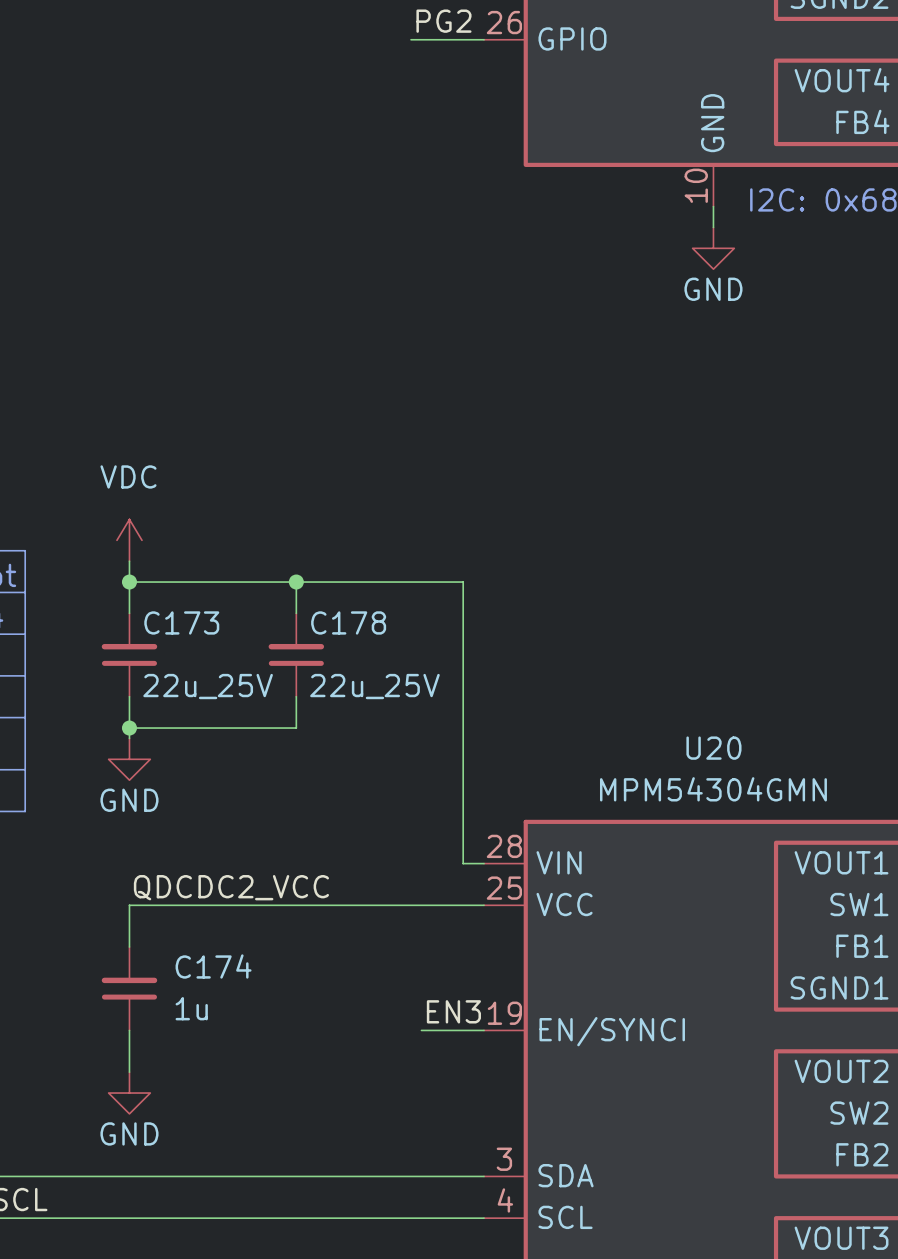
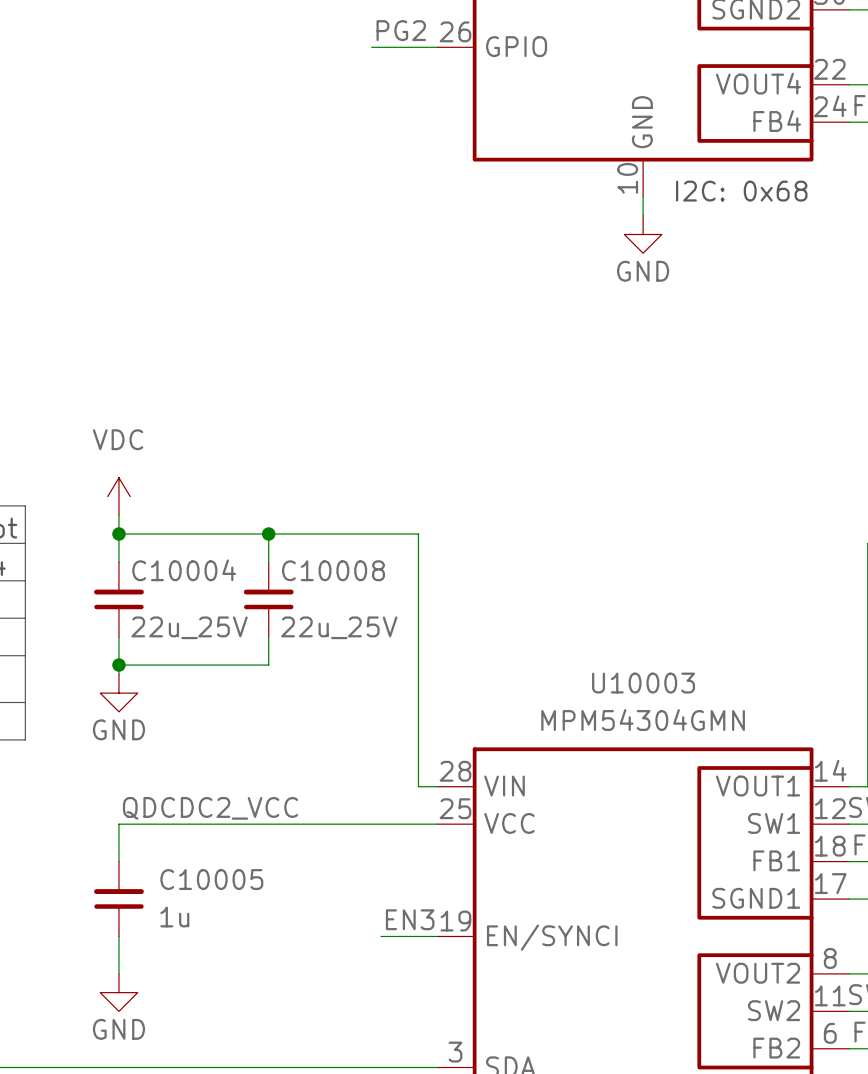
C173 name: C173 (181, 622) -> C10004 (184, 570)
C178 name: C178 (348, 622) -> C10008 (333, 570)
U20 name: U20 (713, 748) -> U10003 (643, 683)
C174 name: C174 (213, 966) -> C10005 (211, 879)

